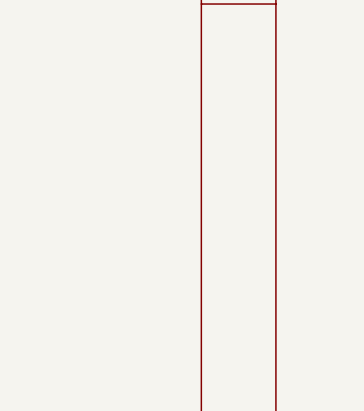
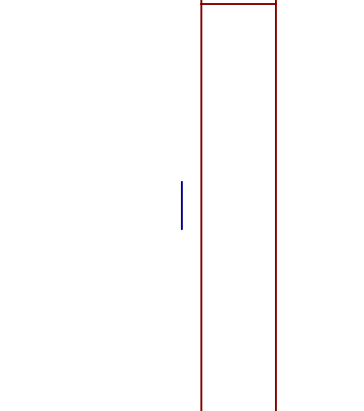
bus: none -> (181, 181) (181, 229)

